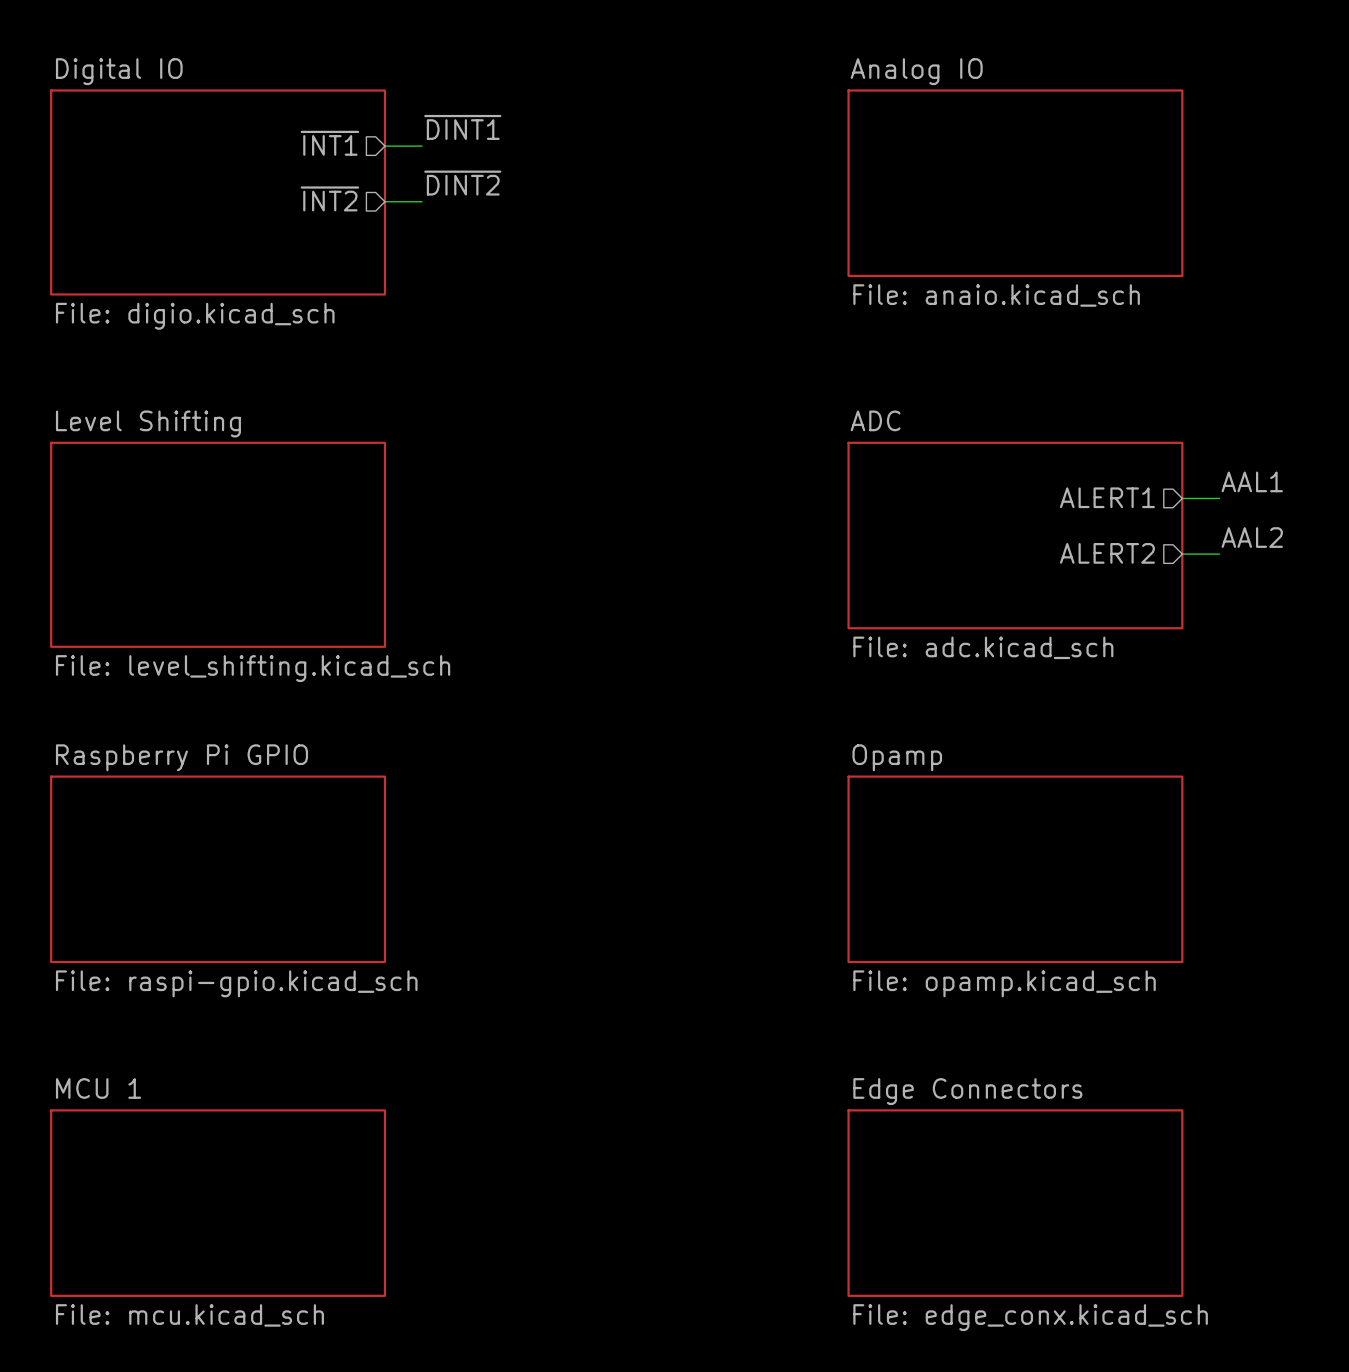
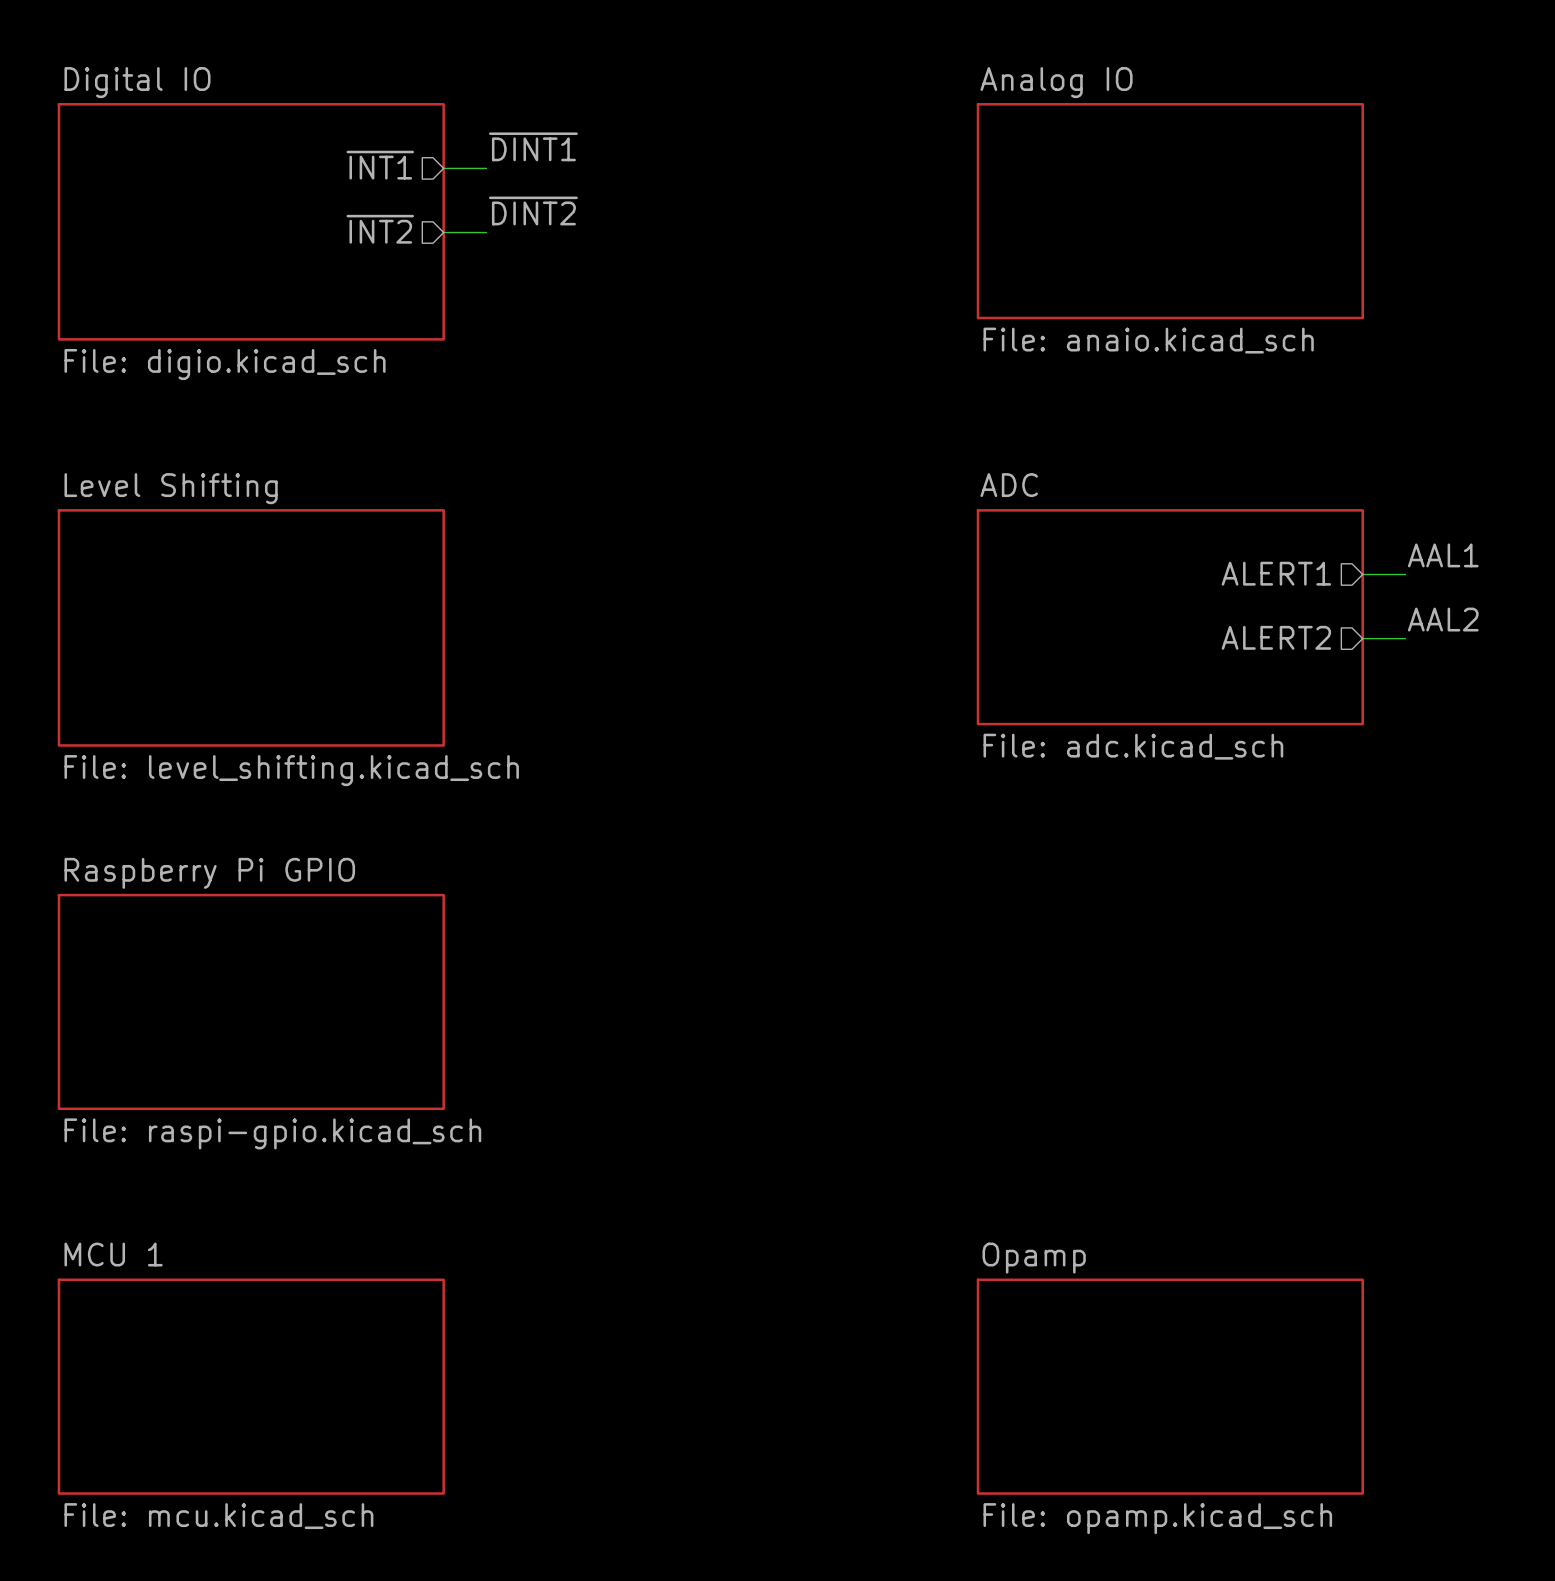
sheet Opamp: File: opamp.kicad_sch (1015, 869) -> none
sheet Edge Connectors name: Edge Connectors (967, 1091) -> Opamp (1034, 1258)
sheet Edge Connectors value: File: edge_conx.kicad_sch (1030, 1317) -> File: opamp.kicad_sch (1157, 1518)

